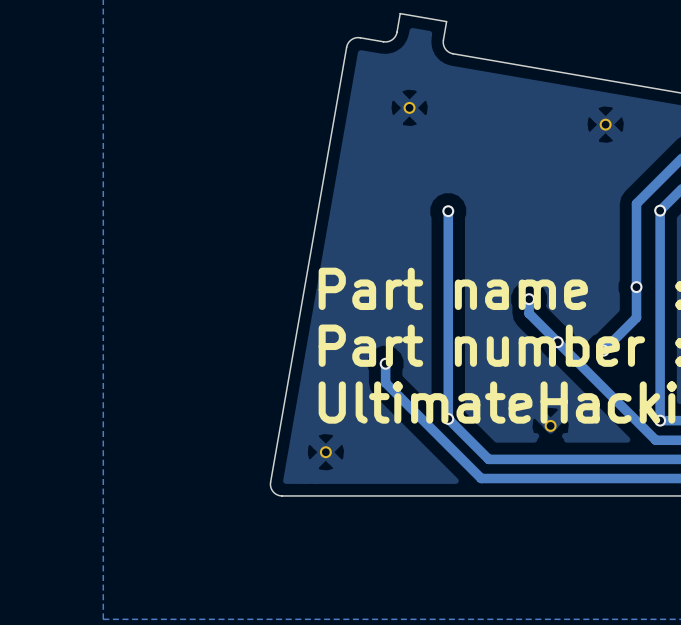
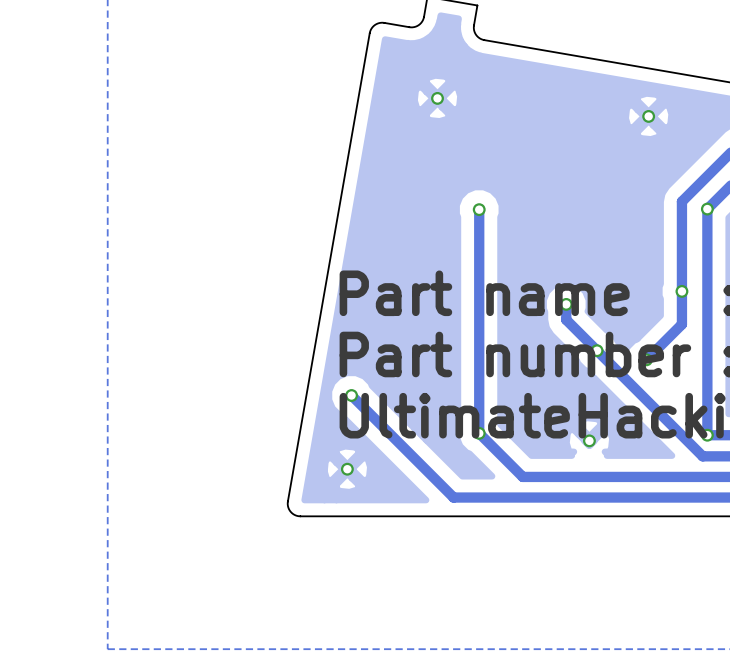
track: (385, 363) (385, 382) (481, 478) -> (351, 395) (453, 497) (514, 497)
via position: (385, 363) -> (351, 395)

